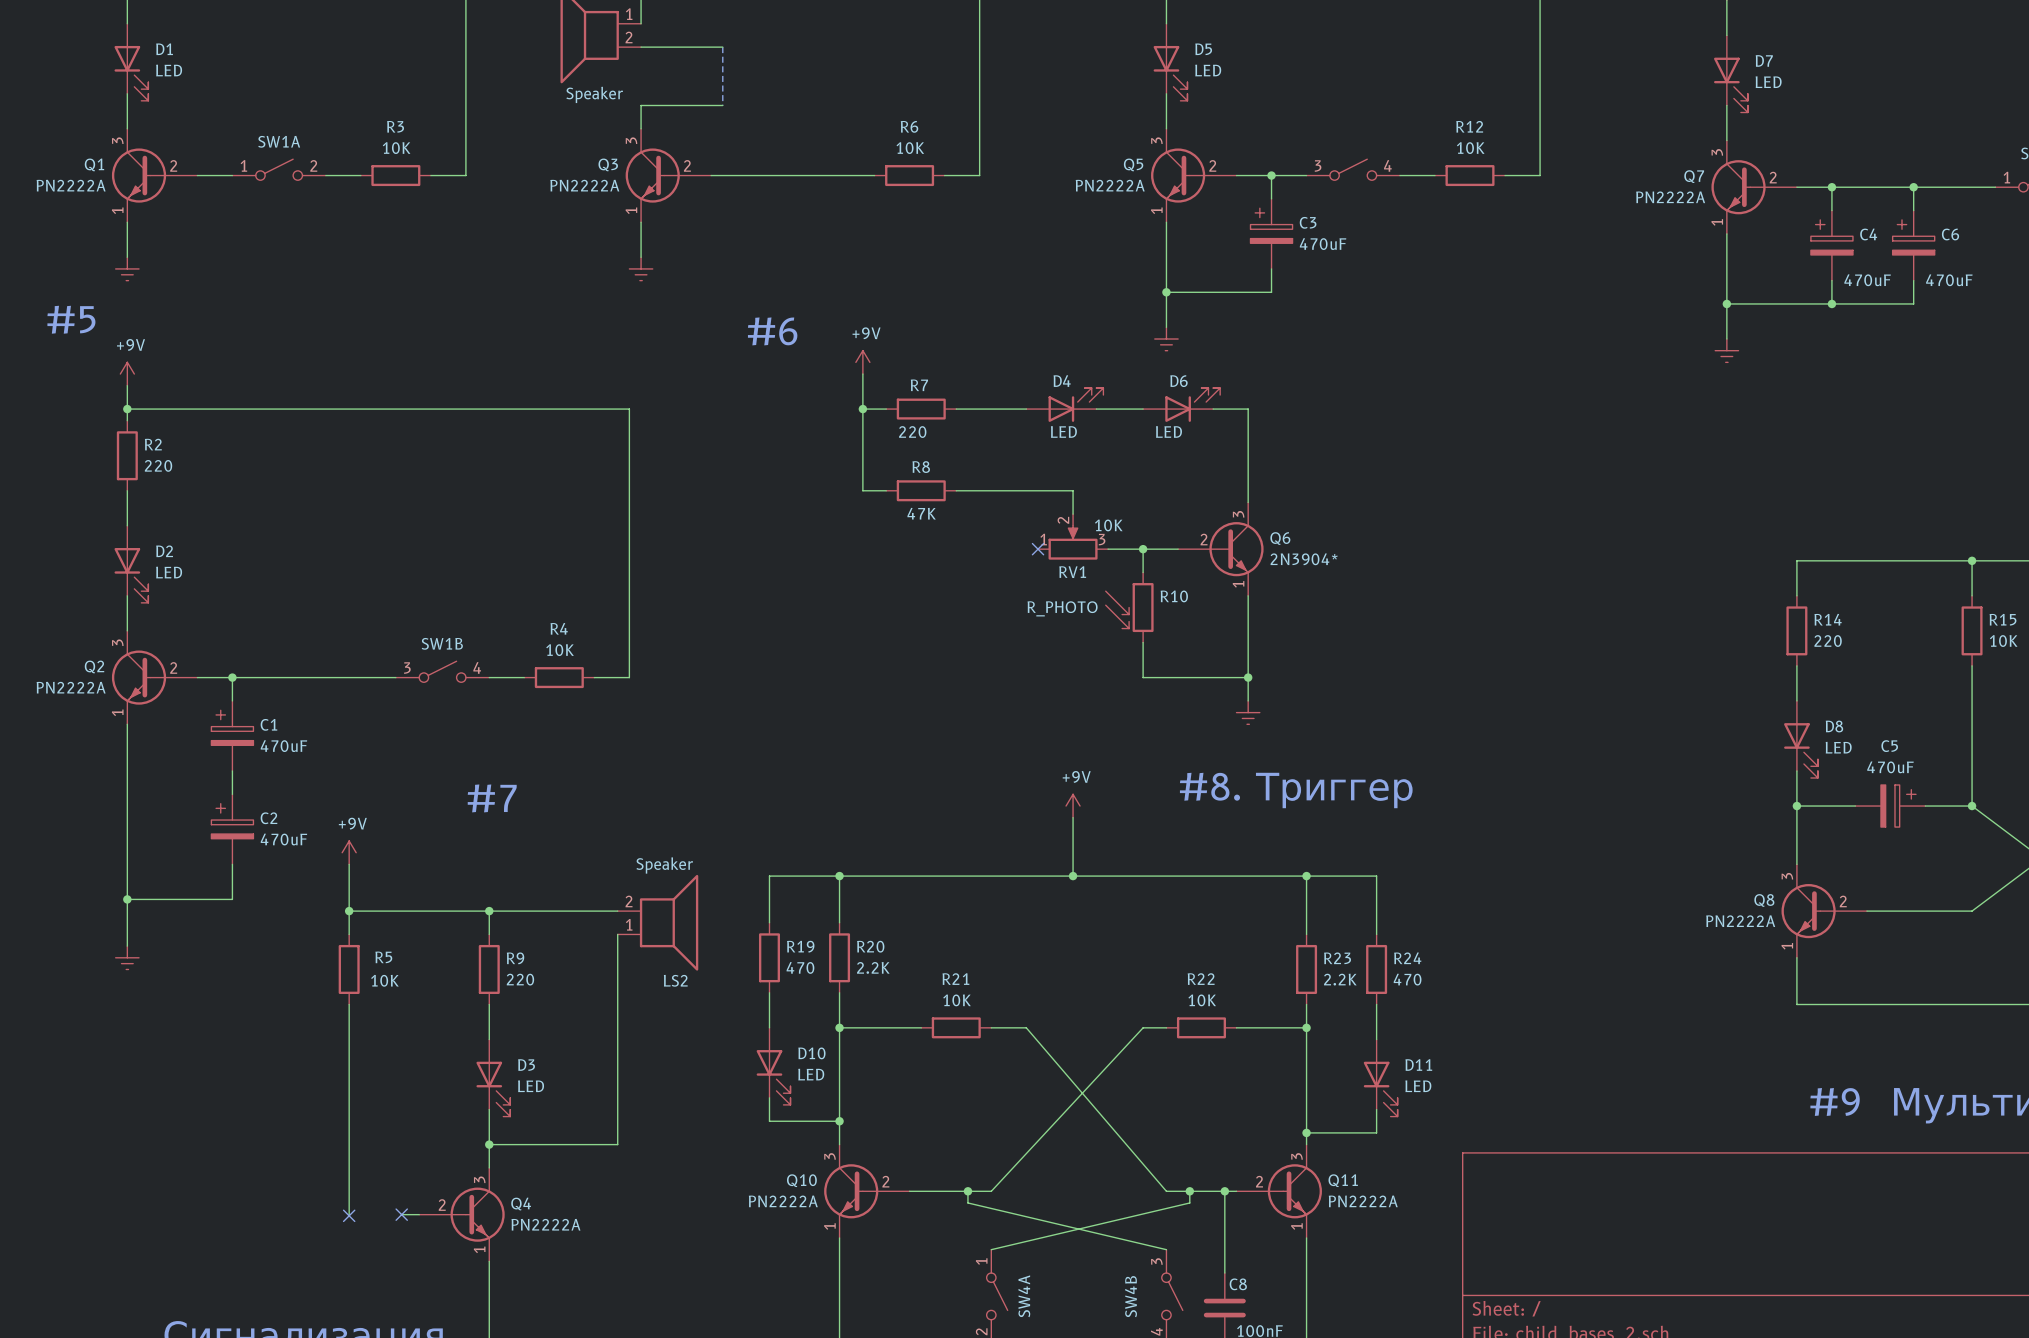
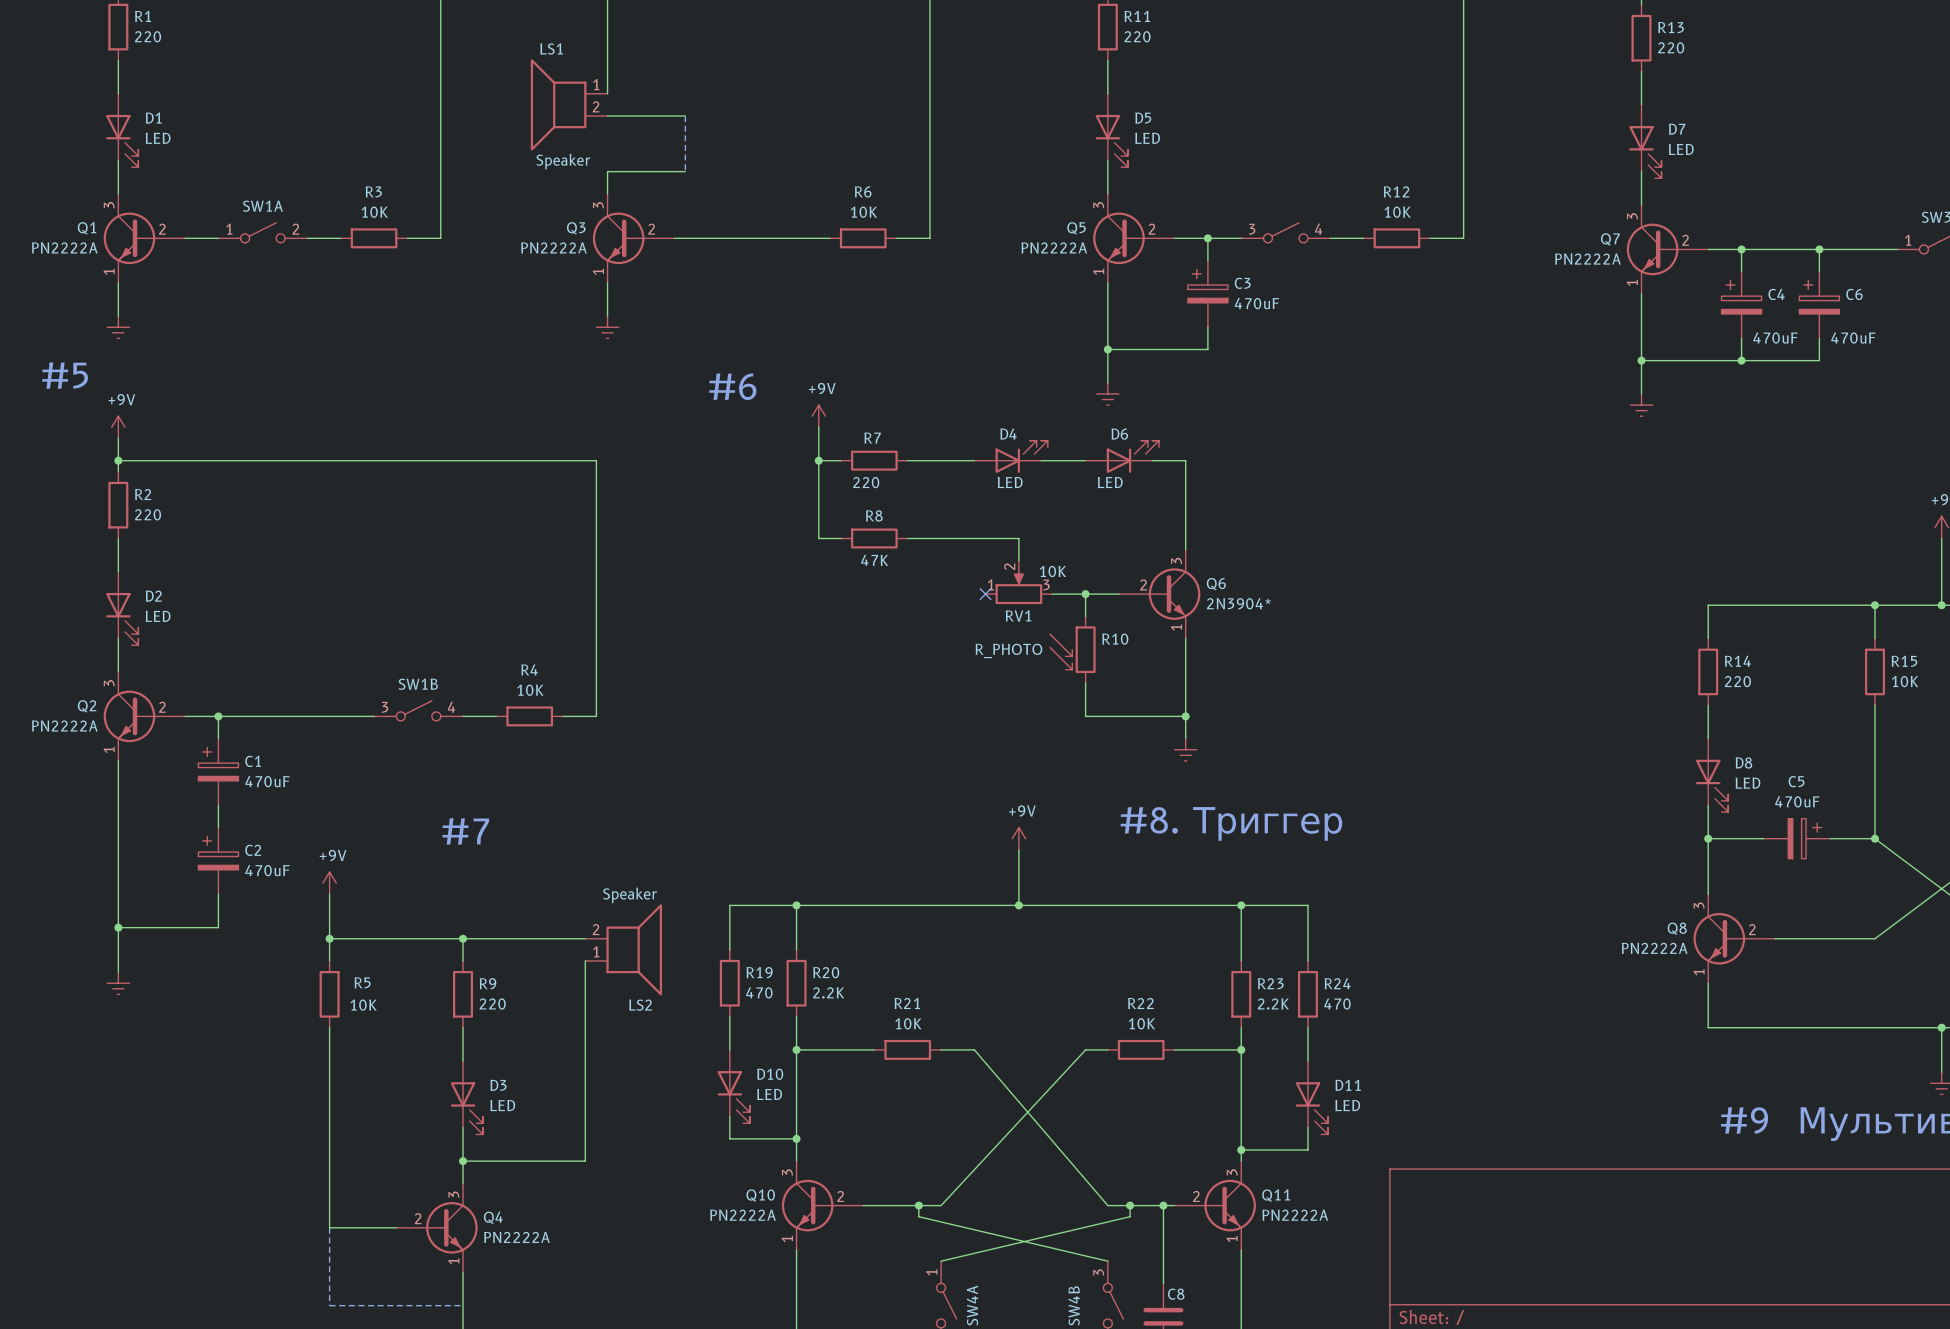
wire: none -> (329, 1227) (379, 1227)
line: none -> (329, 1227) (329, 1305) (463, 1305)
no-connect mark: (401, 1214) -> none
no-connect mark: (349, 1215) -> none

